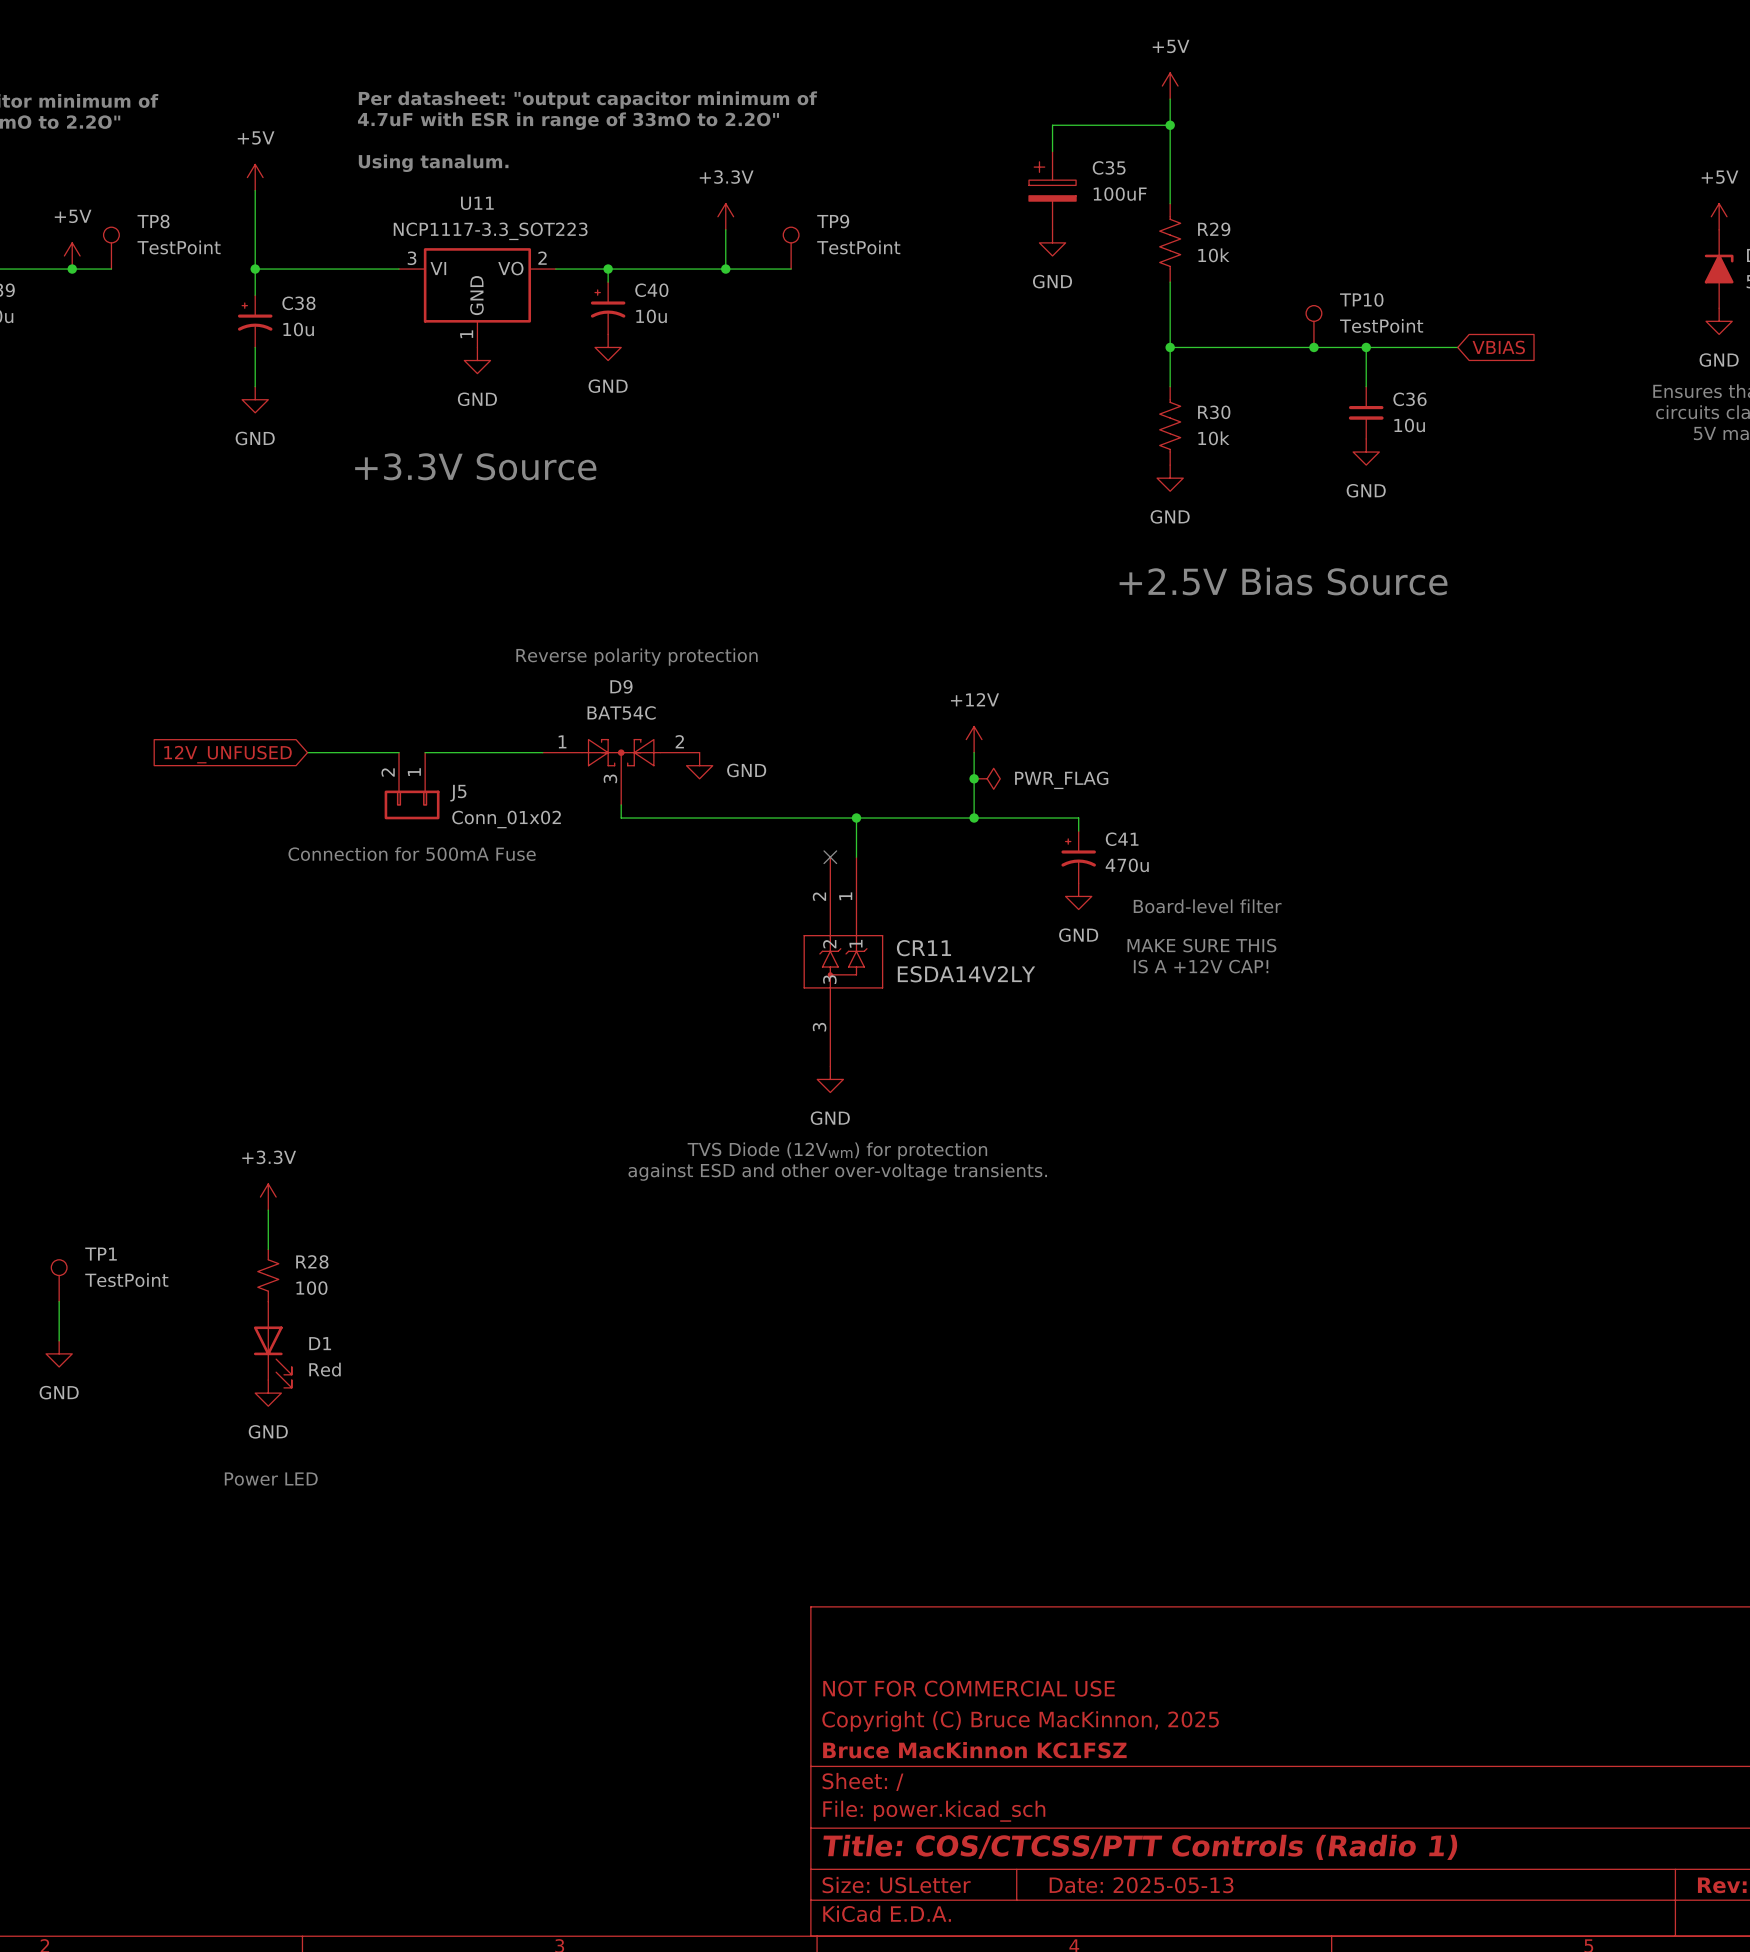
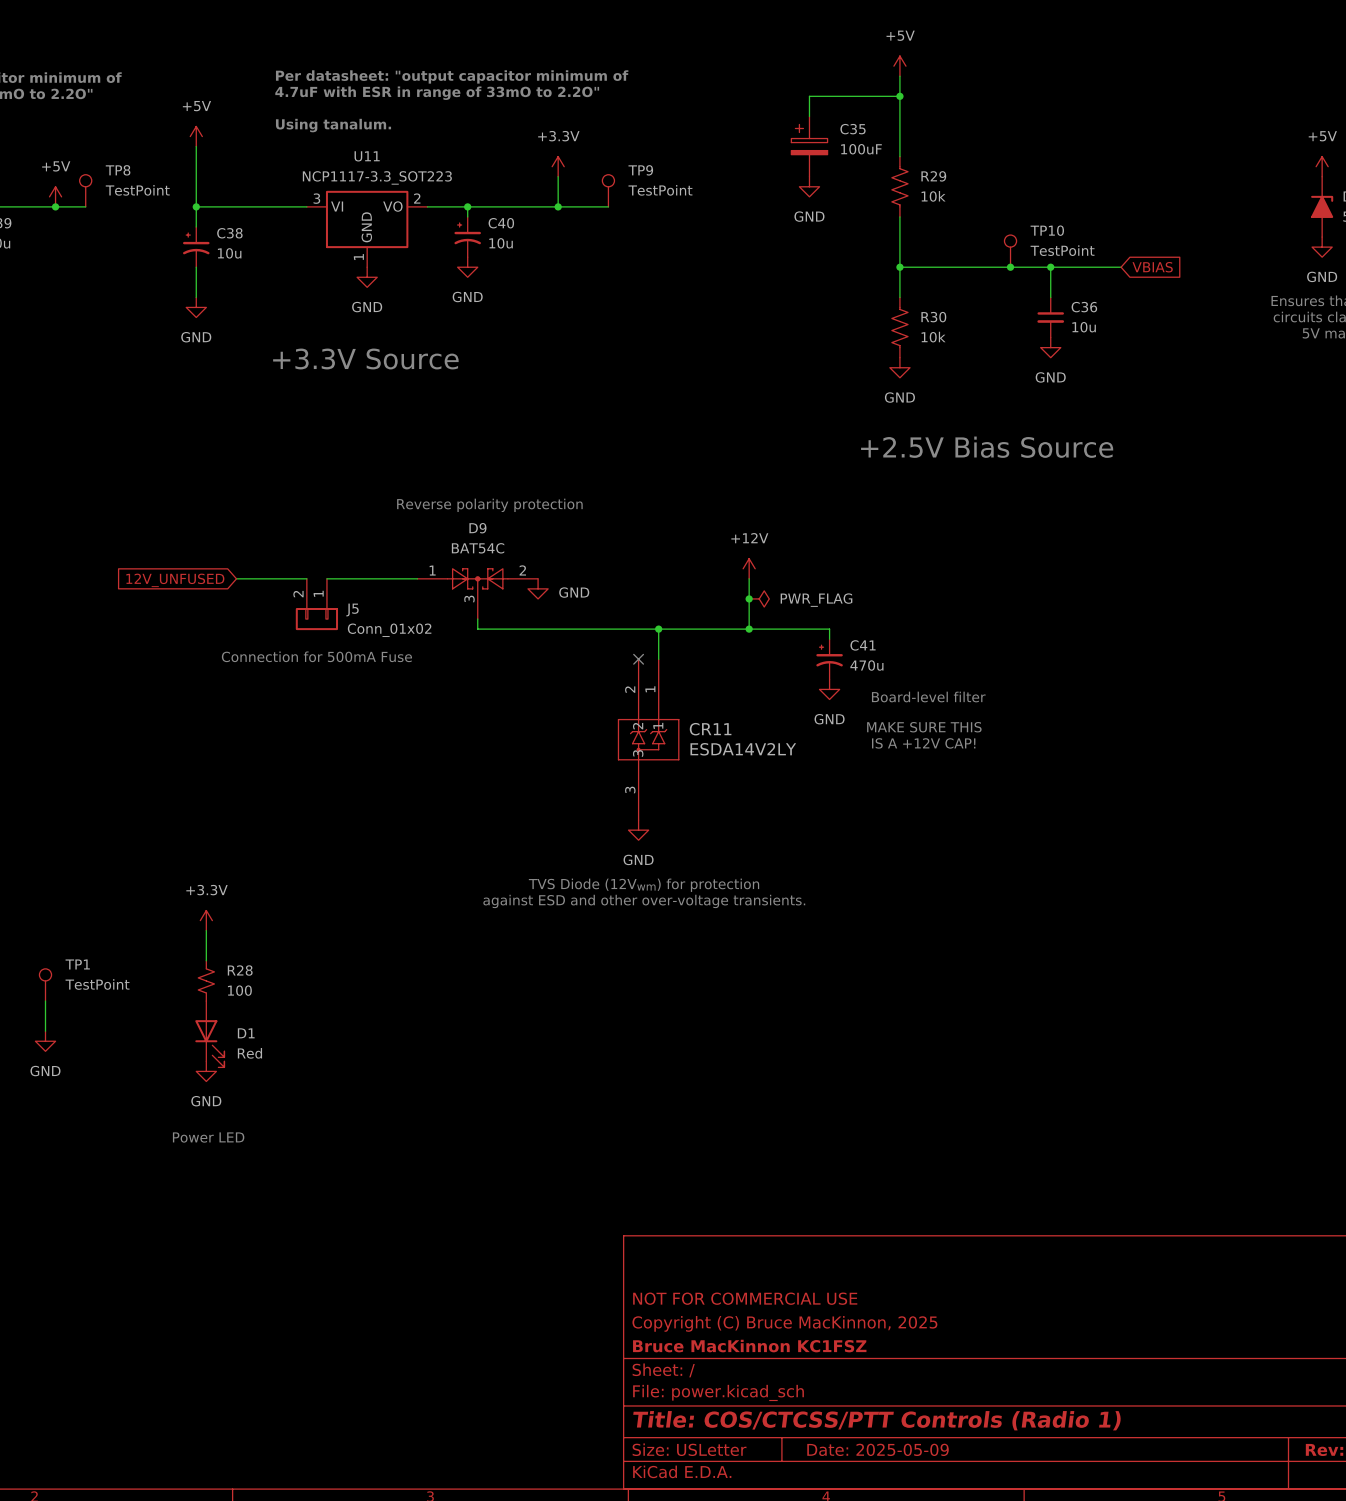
title block: Date: 2025-05-13 (1141, 1885) -> Date: 2025-05-09 (878, 1449)

